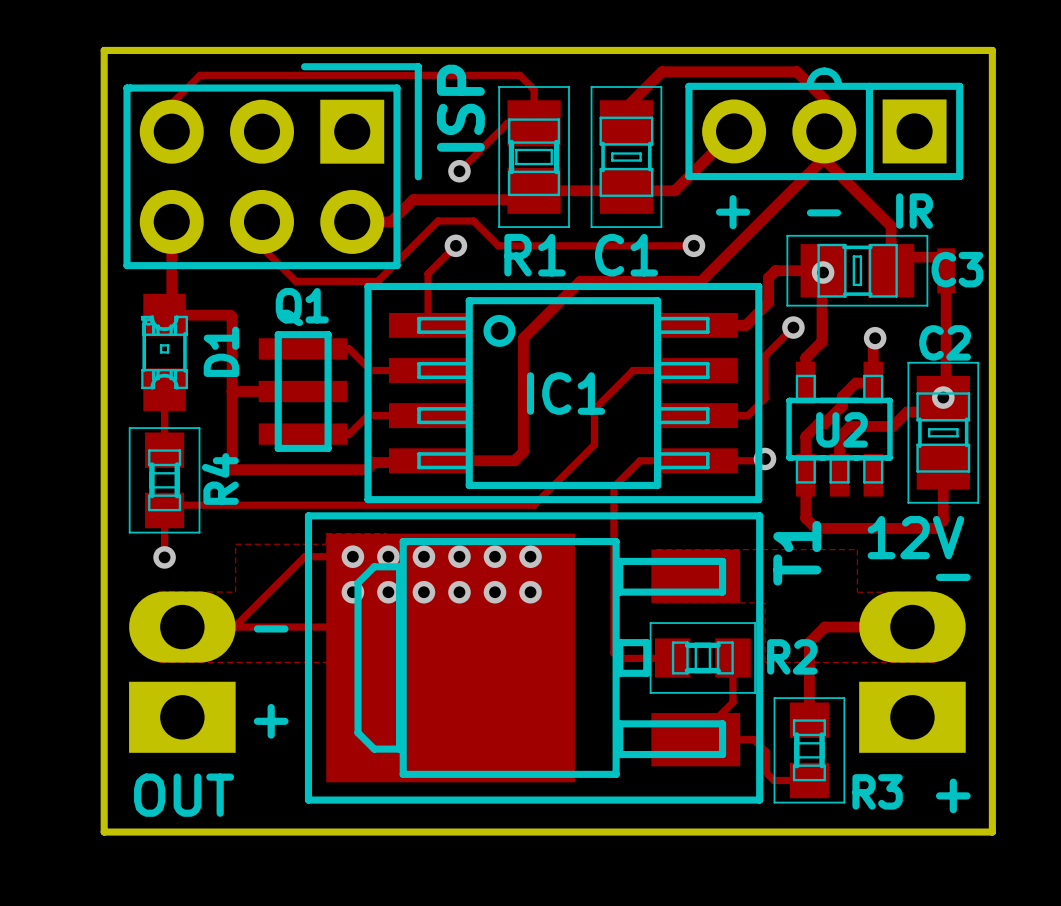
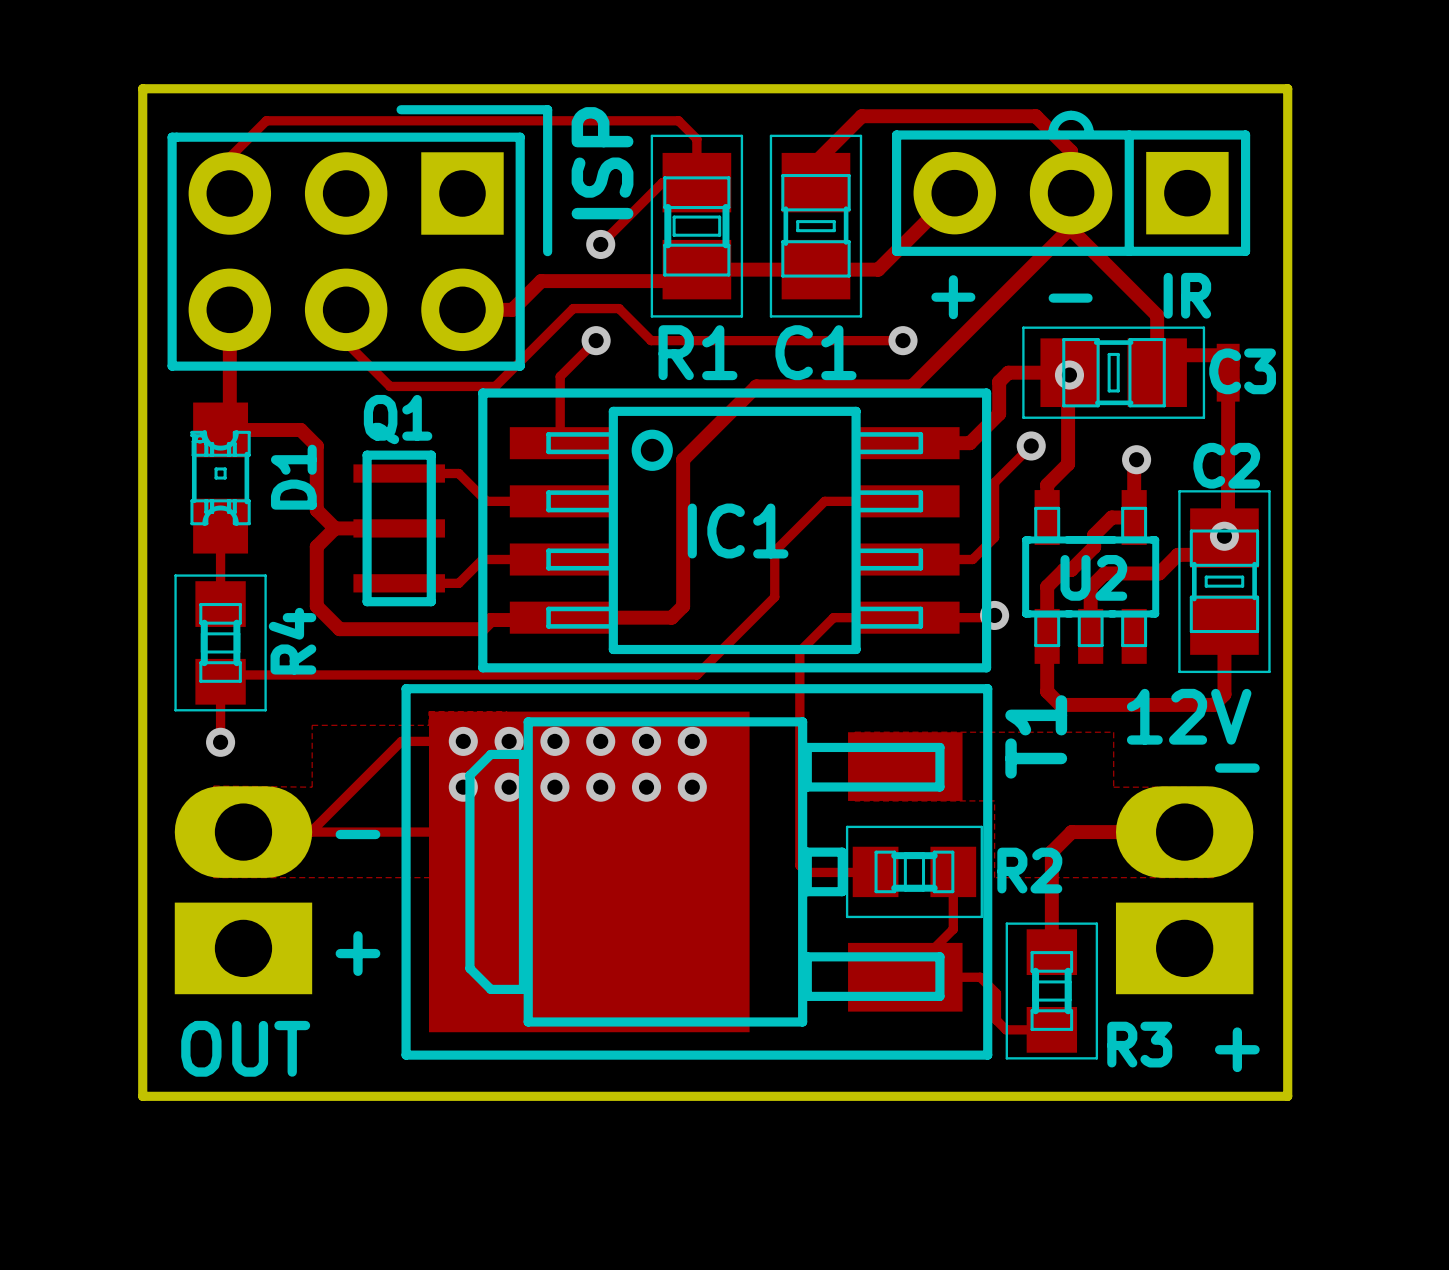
track: (226, 315) (232, 316) (232, 469) (256, 469) -> (300, 429) (316, 445) (316, 510) (335, 528) (316, 546) (316, 606) (339, 629)
Q1 footprint: [258, 331, 348, 452] -> [353, 450, 445, 607]
track: (232, 391) (253, 391) -> none

